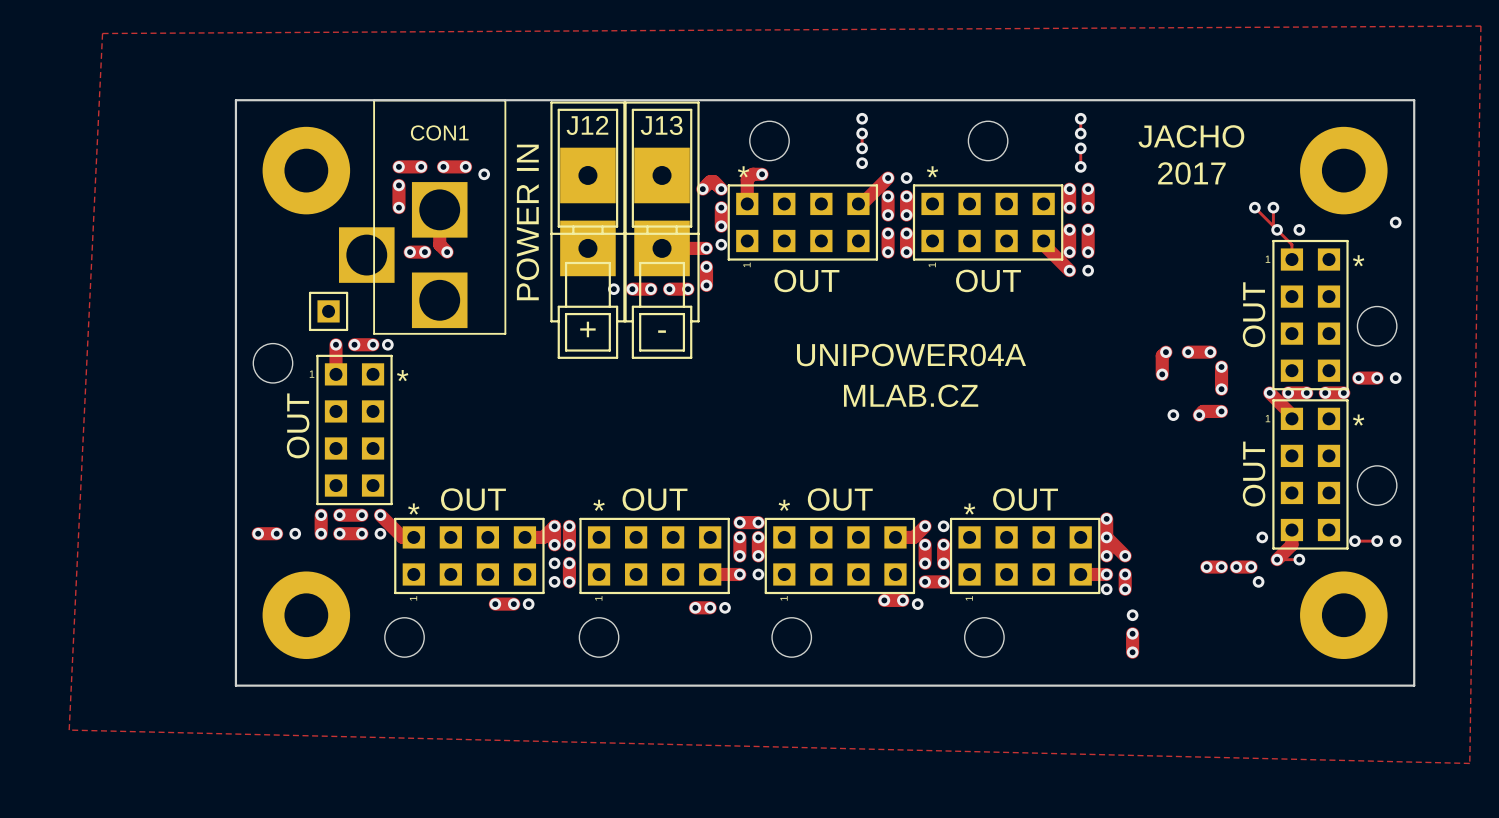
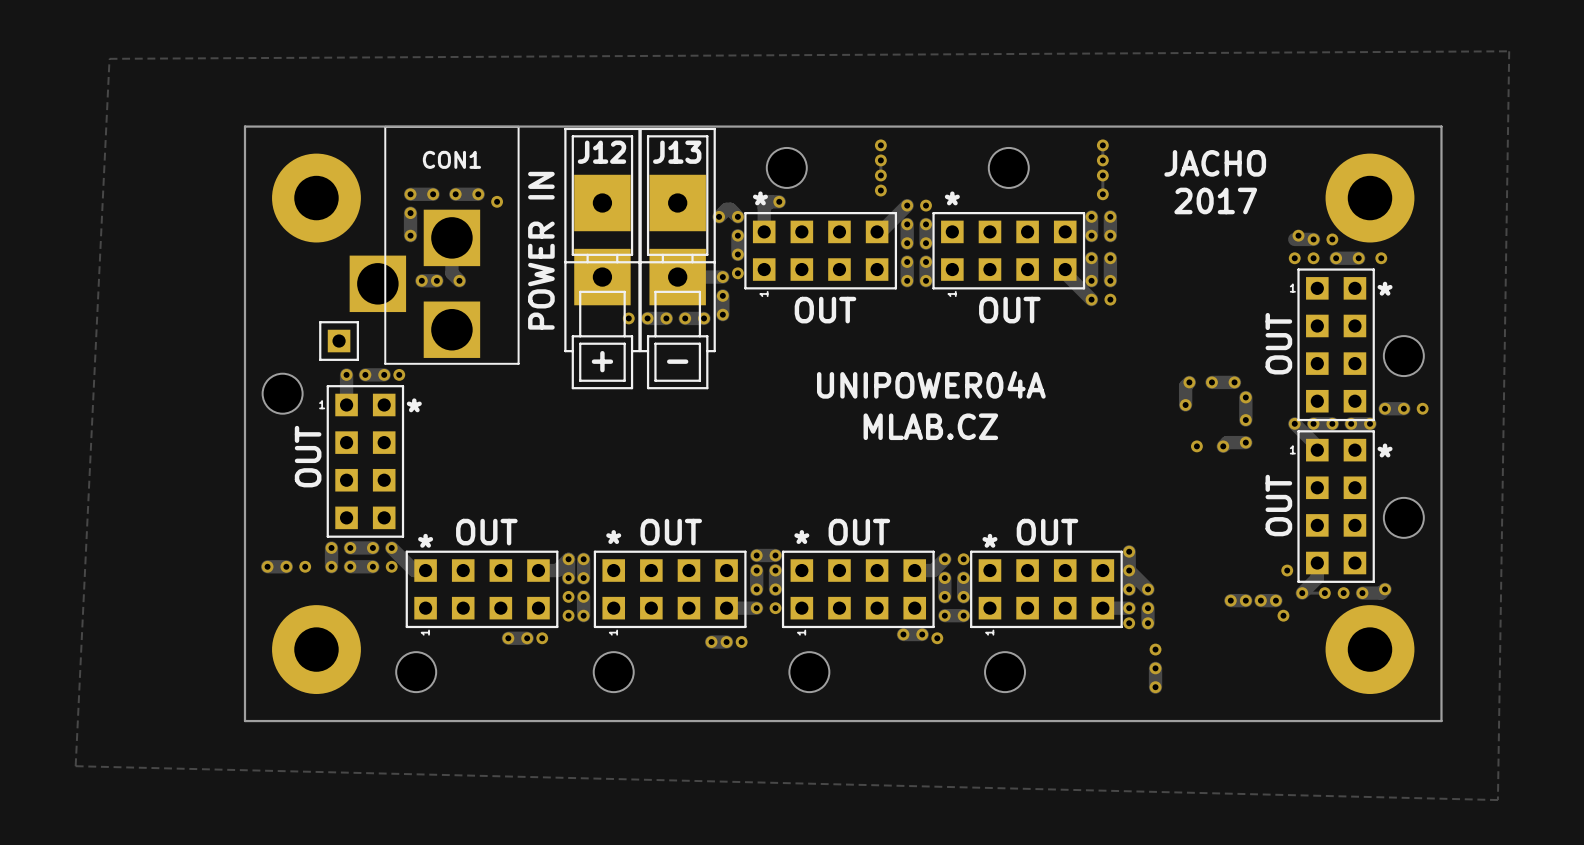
track: (1254, 207) (1291, 244) (1291, 259) -> none
via: (1254, 207) -> none
track: (1273, 207) (1273, 226) -> none
track: none -> (1294, 239) (1313, 239)
via: none -> (1313, 239)
via: none -> (1332, 239)
via: (1395, 222) -> none
via: none -> (1294, 258)
via: (1277, 229) -> none
via: none -> (1313, 258)
via: (1299, 229) -> none
via: none -> (1336, 258)
via: none -> (1358, 258)
via: none -> (1381, 258)
track: (1354, 541) (1377, 541) -> (1336, 258) (1358, 258)
via: (1354, 541) -> none
via: (1377, 541) -> none
via: (1395, 541) -> none
track: none -> (1385, 589) (1381, 593) (1362, 593)
via: none -> (1385, 589)
via: none -> (1343, 593)
via: none -> (1362, 593)

